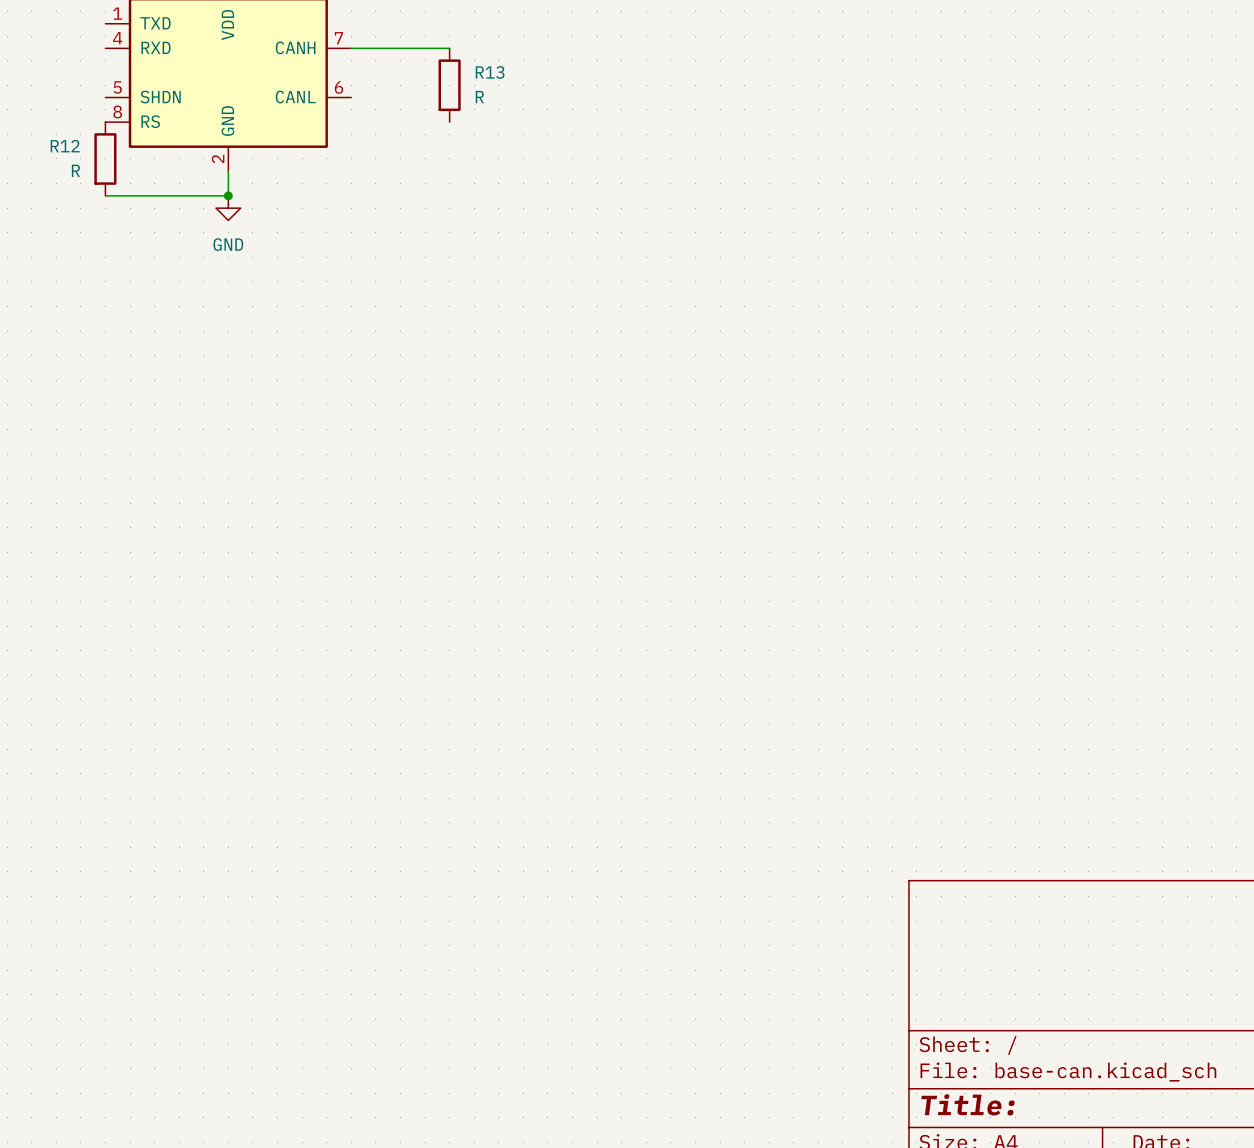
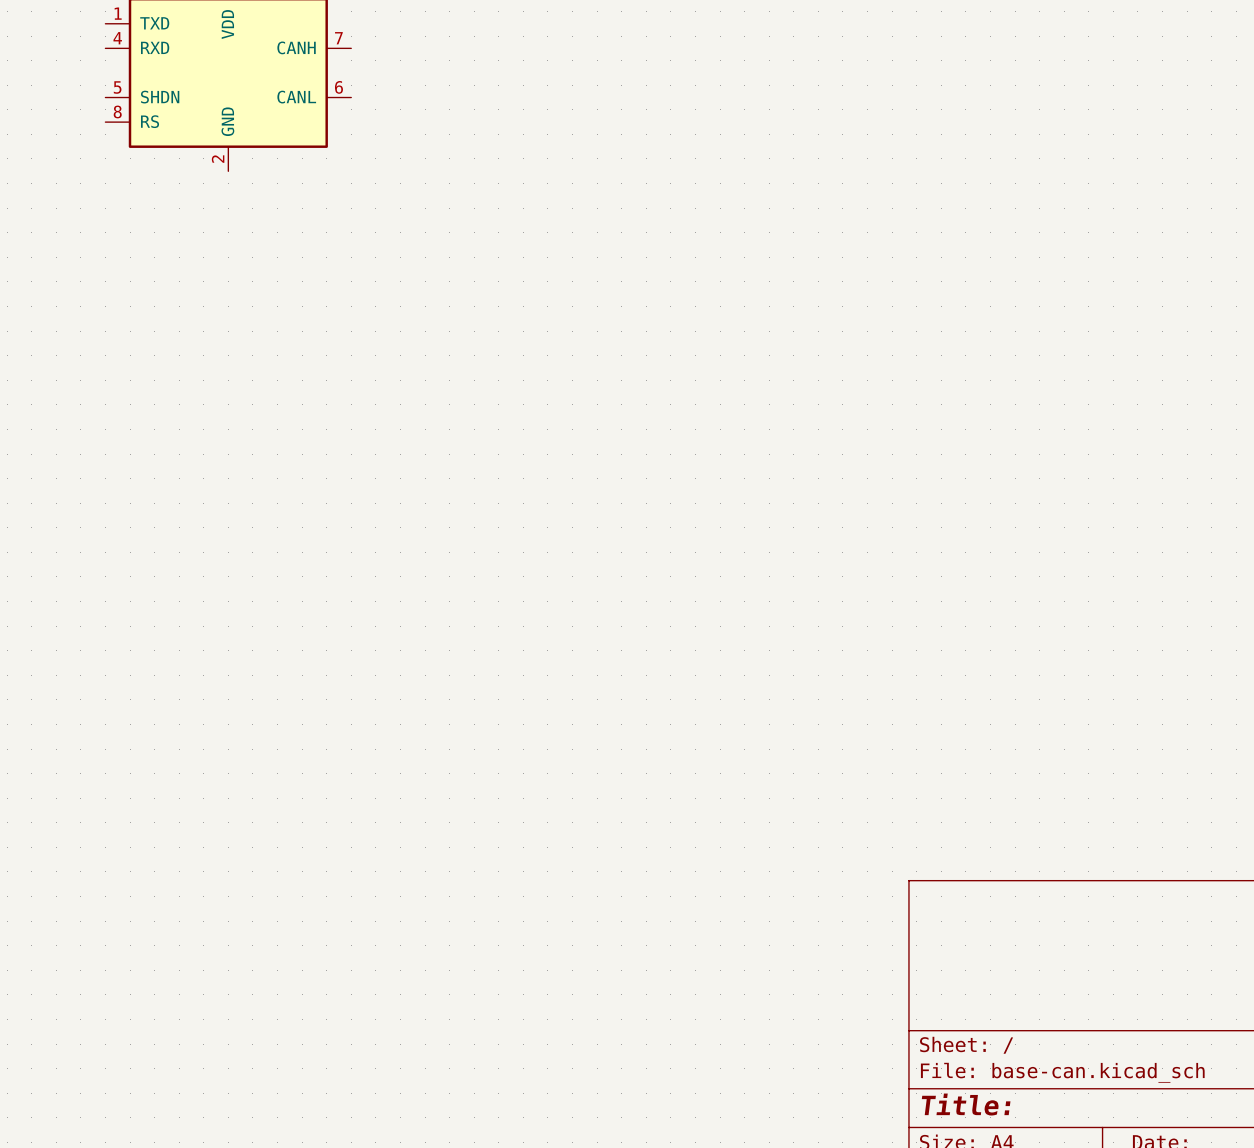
wire: (351, 48) (449, 48) -> none
R13: R (449, 85) -> none
R12: R (105, 158) -> none
wire: (228, 171) (228, 195) (105, 195) -> none
junction: (228, 195) -> none
power symbol: GND (228, 208) -> none

